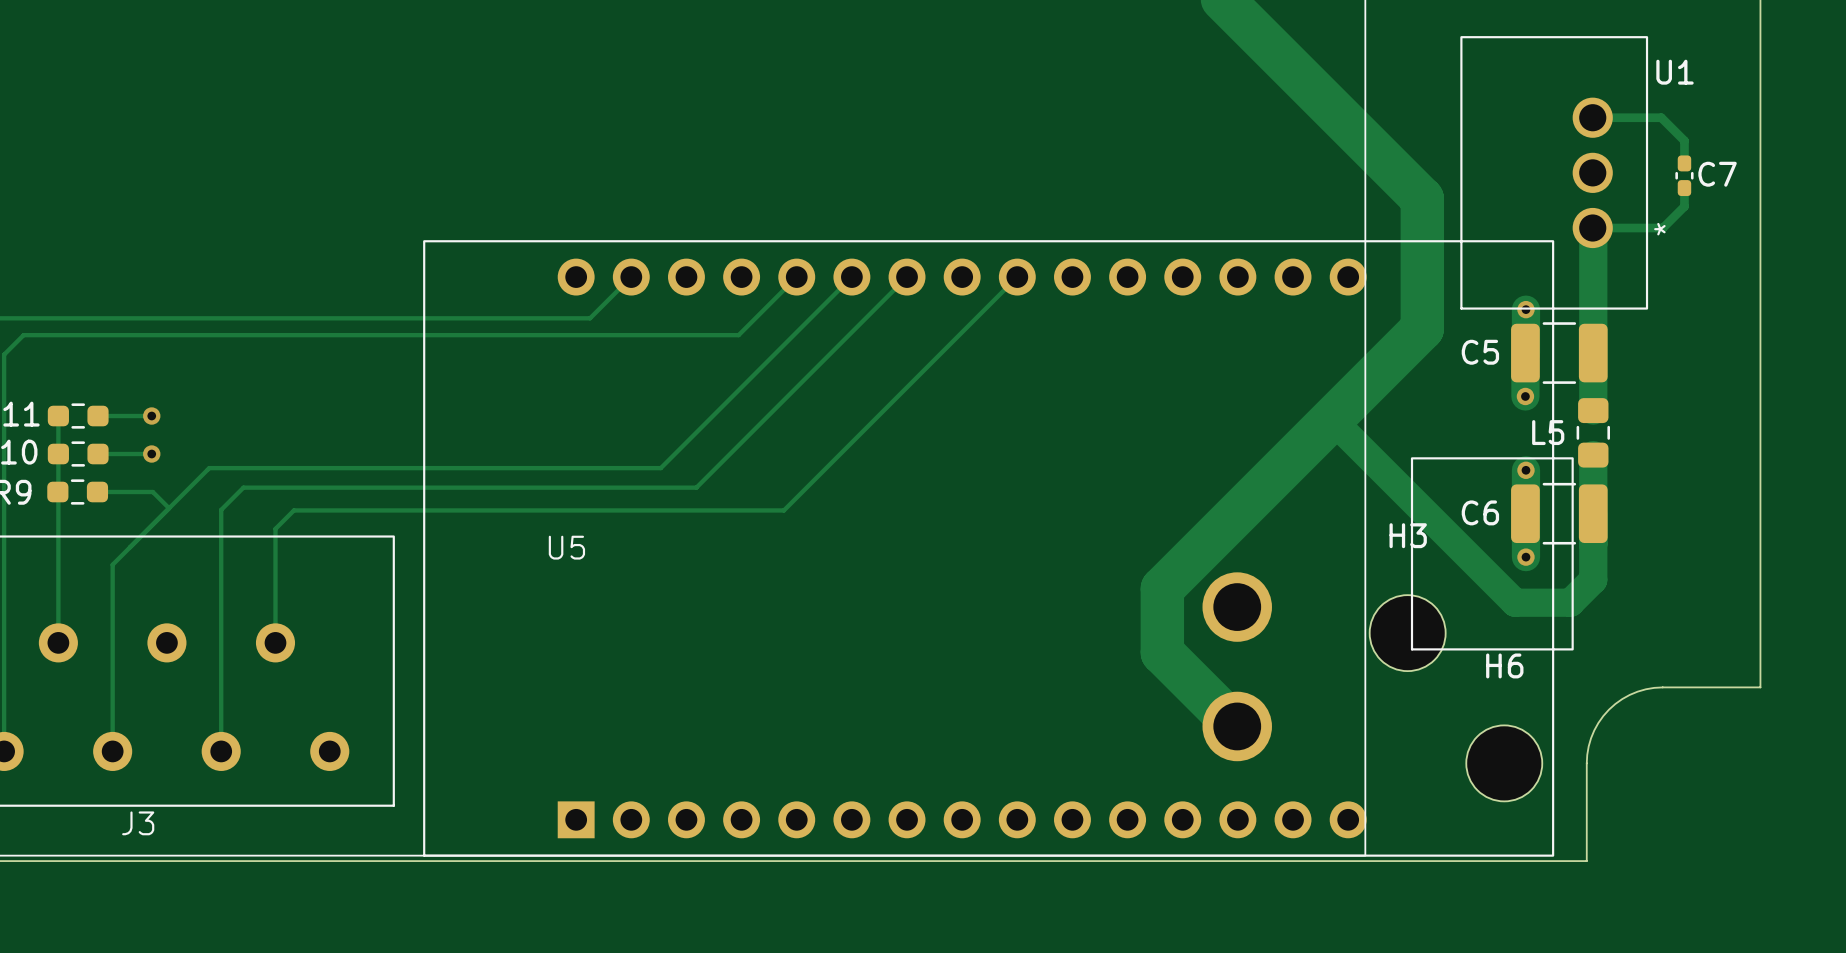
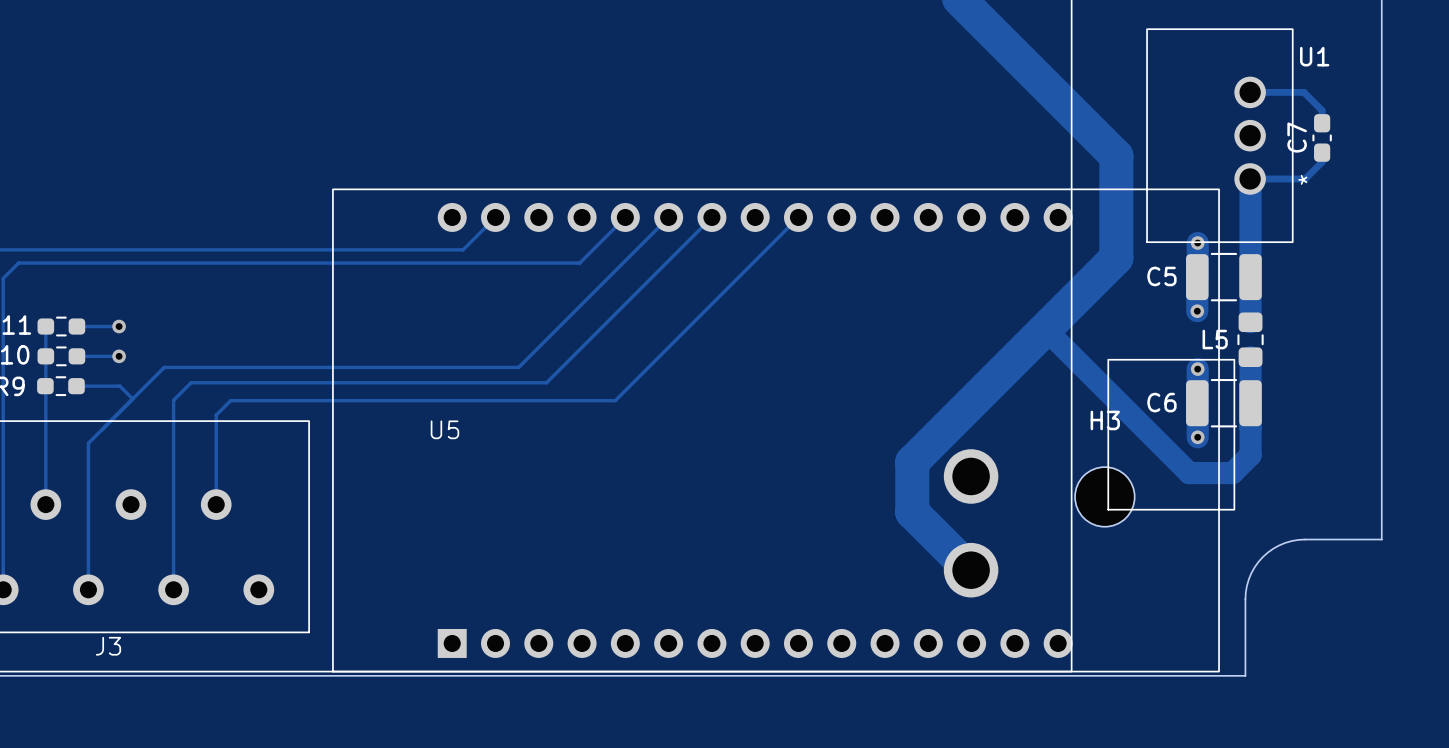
C7 footprint: [1675, 155, 1694, 197] -> [1312, 114, 1332, 162]
C7 name rotation: 0° (1717, 174) -> 90° counterclockwise (1297, 137)
C7 name position: C7 (1717, 174) -> C7 (1297, 137)
H6: (1504, 763) -> none

